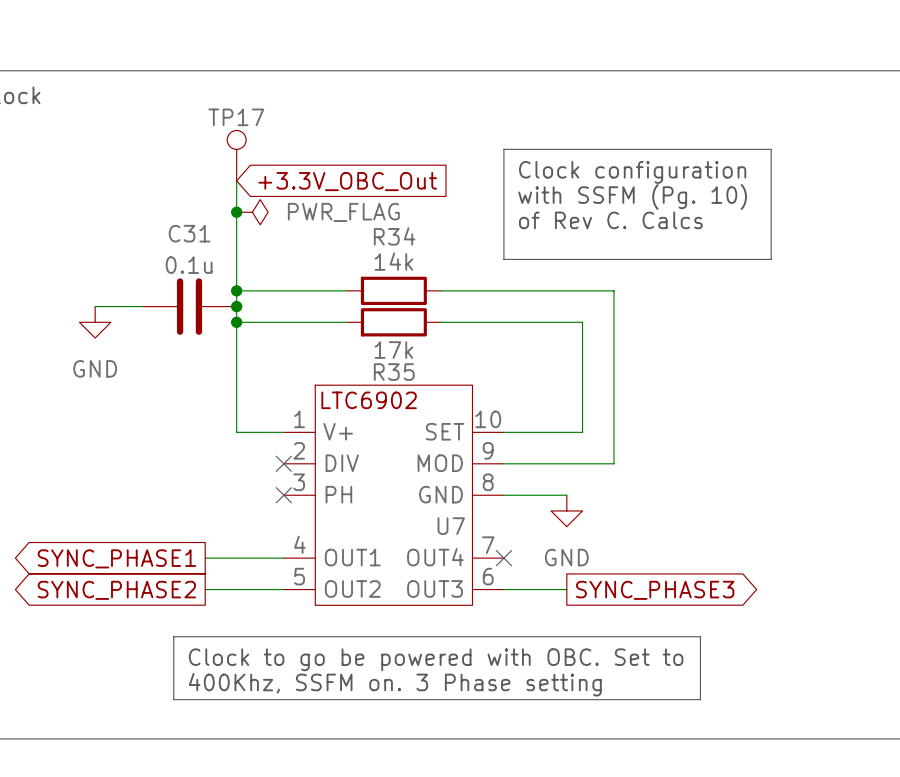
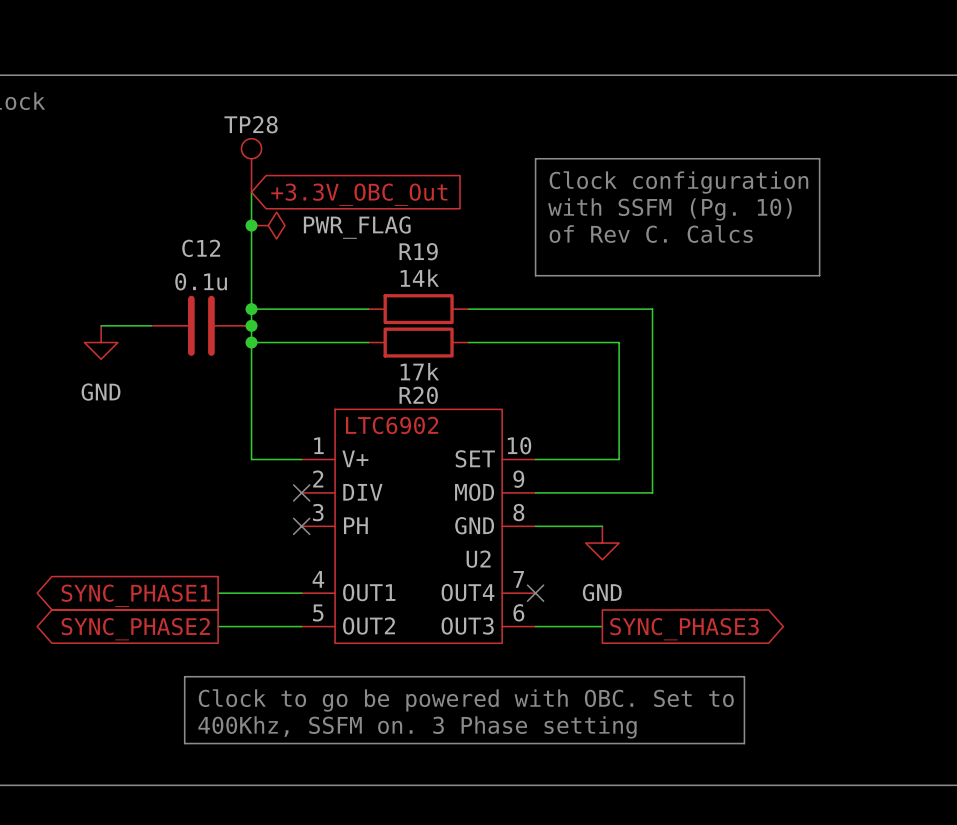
TP17 name: TP17 (236, 117) -> TP28 (251, 124)
C31 name: C31 (189, 233) -> C12 (201, 248)
R34 name: R34 (394, 236) -> R19 (418, 251)
R35 name: R35 (394, 372) -> R20 (418, 395)
U7 name: U7 (451, 526) -> U2 (478, 559)

